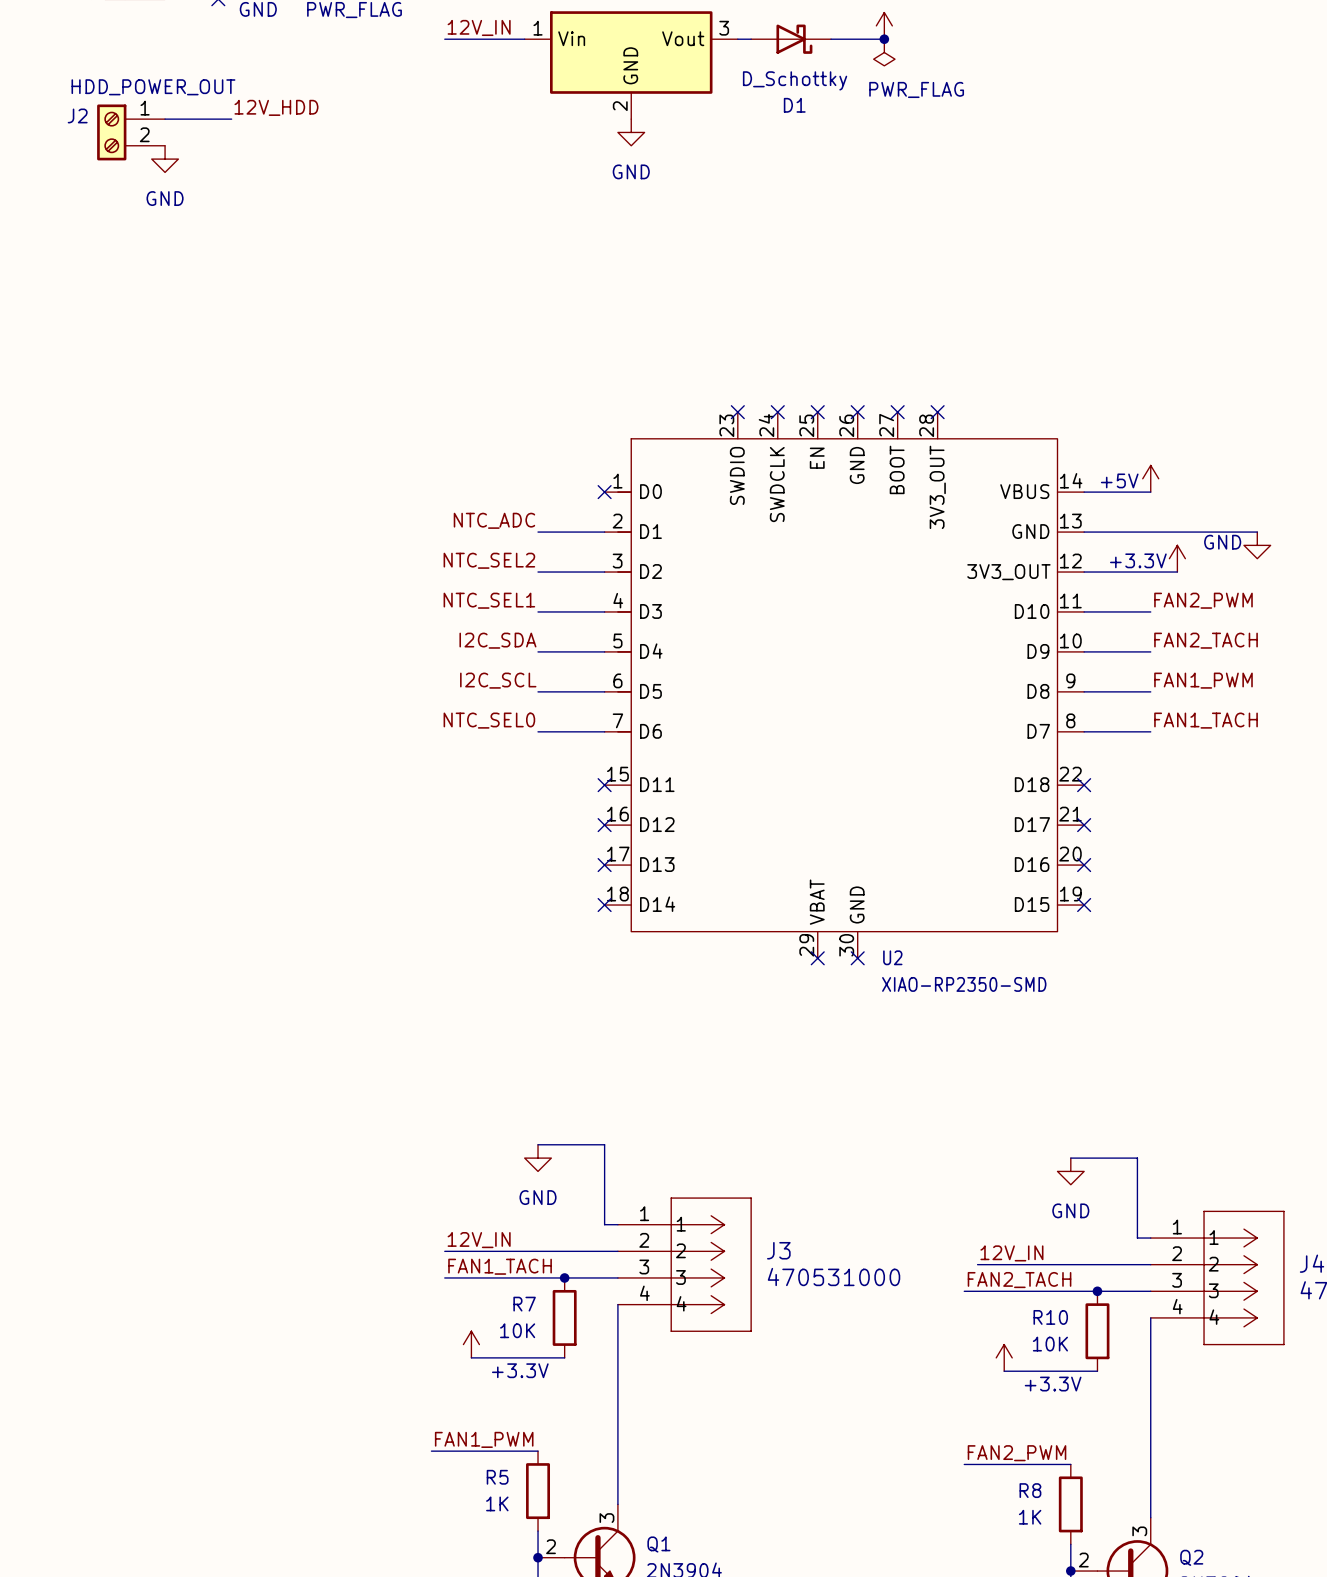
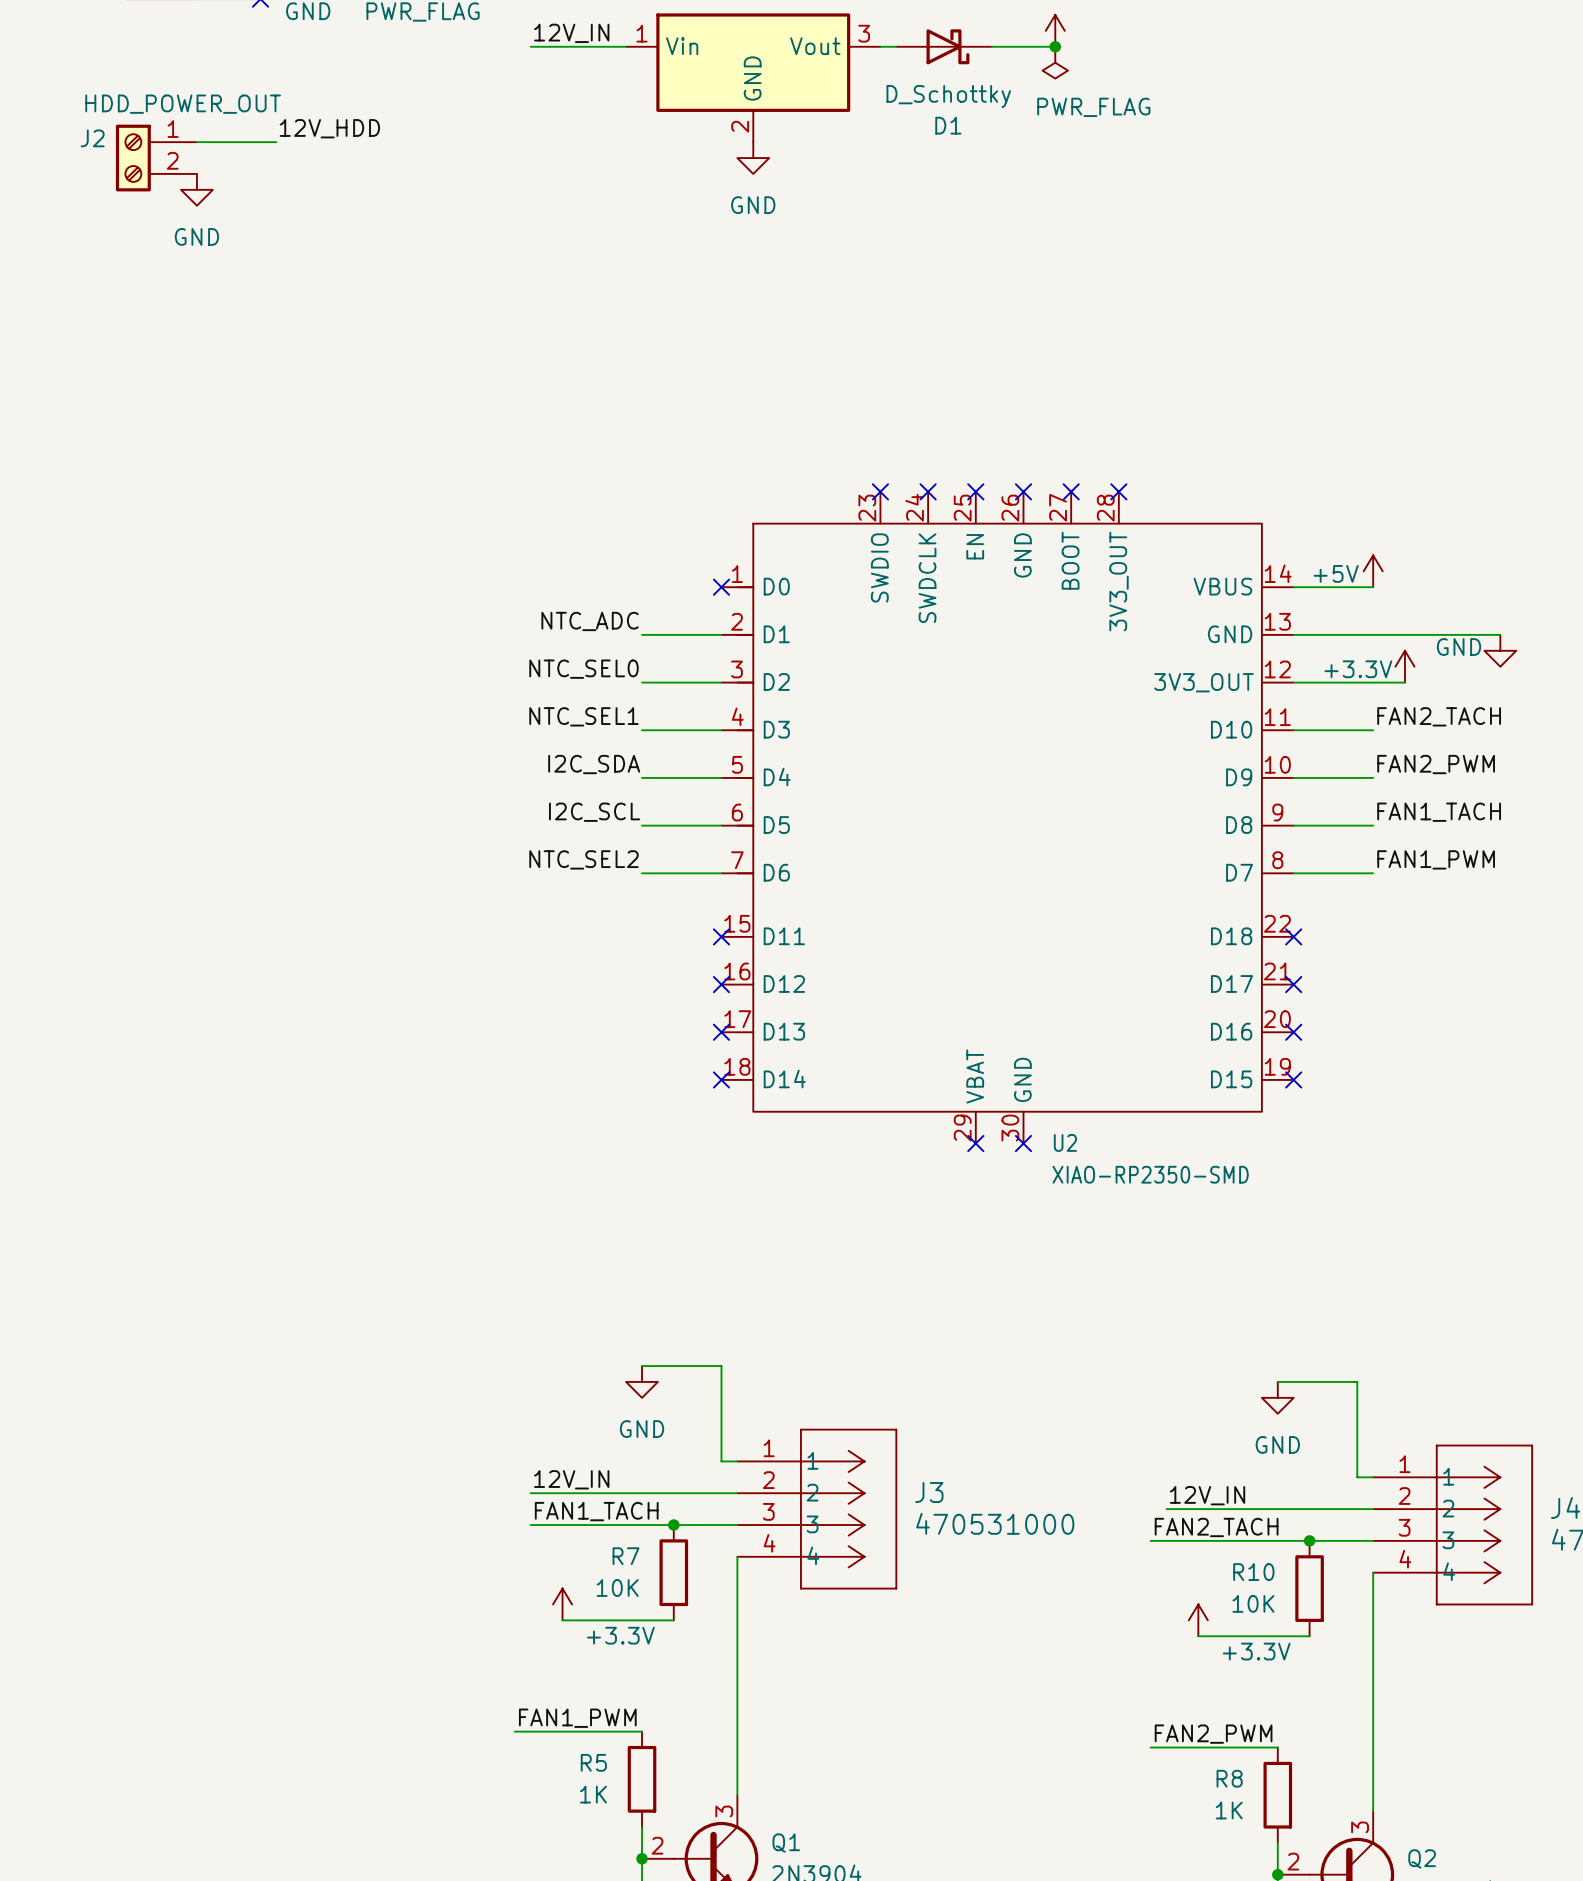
label: NTC_SEL2 (489, 560) -> NTC_SEL0 (583, 669)
label: FAN2_PWM (1203, 600) -> FAN2_TACH (1439, 716)
label: FAN2_TACH (1206, 640) -> FAN2_PWM (1436, 764)
label: FAN1_PWM (1203, 680) -> FAN1_TACH (1439, 812)
label: NTC_SEL0 (489, 720) -> NTC_SEL2 (583, 859)
label: FAN1_TACH (1206, 720) -> FAN1_PWM (1436, 859)

